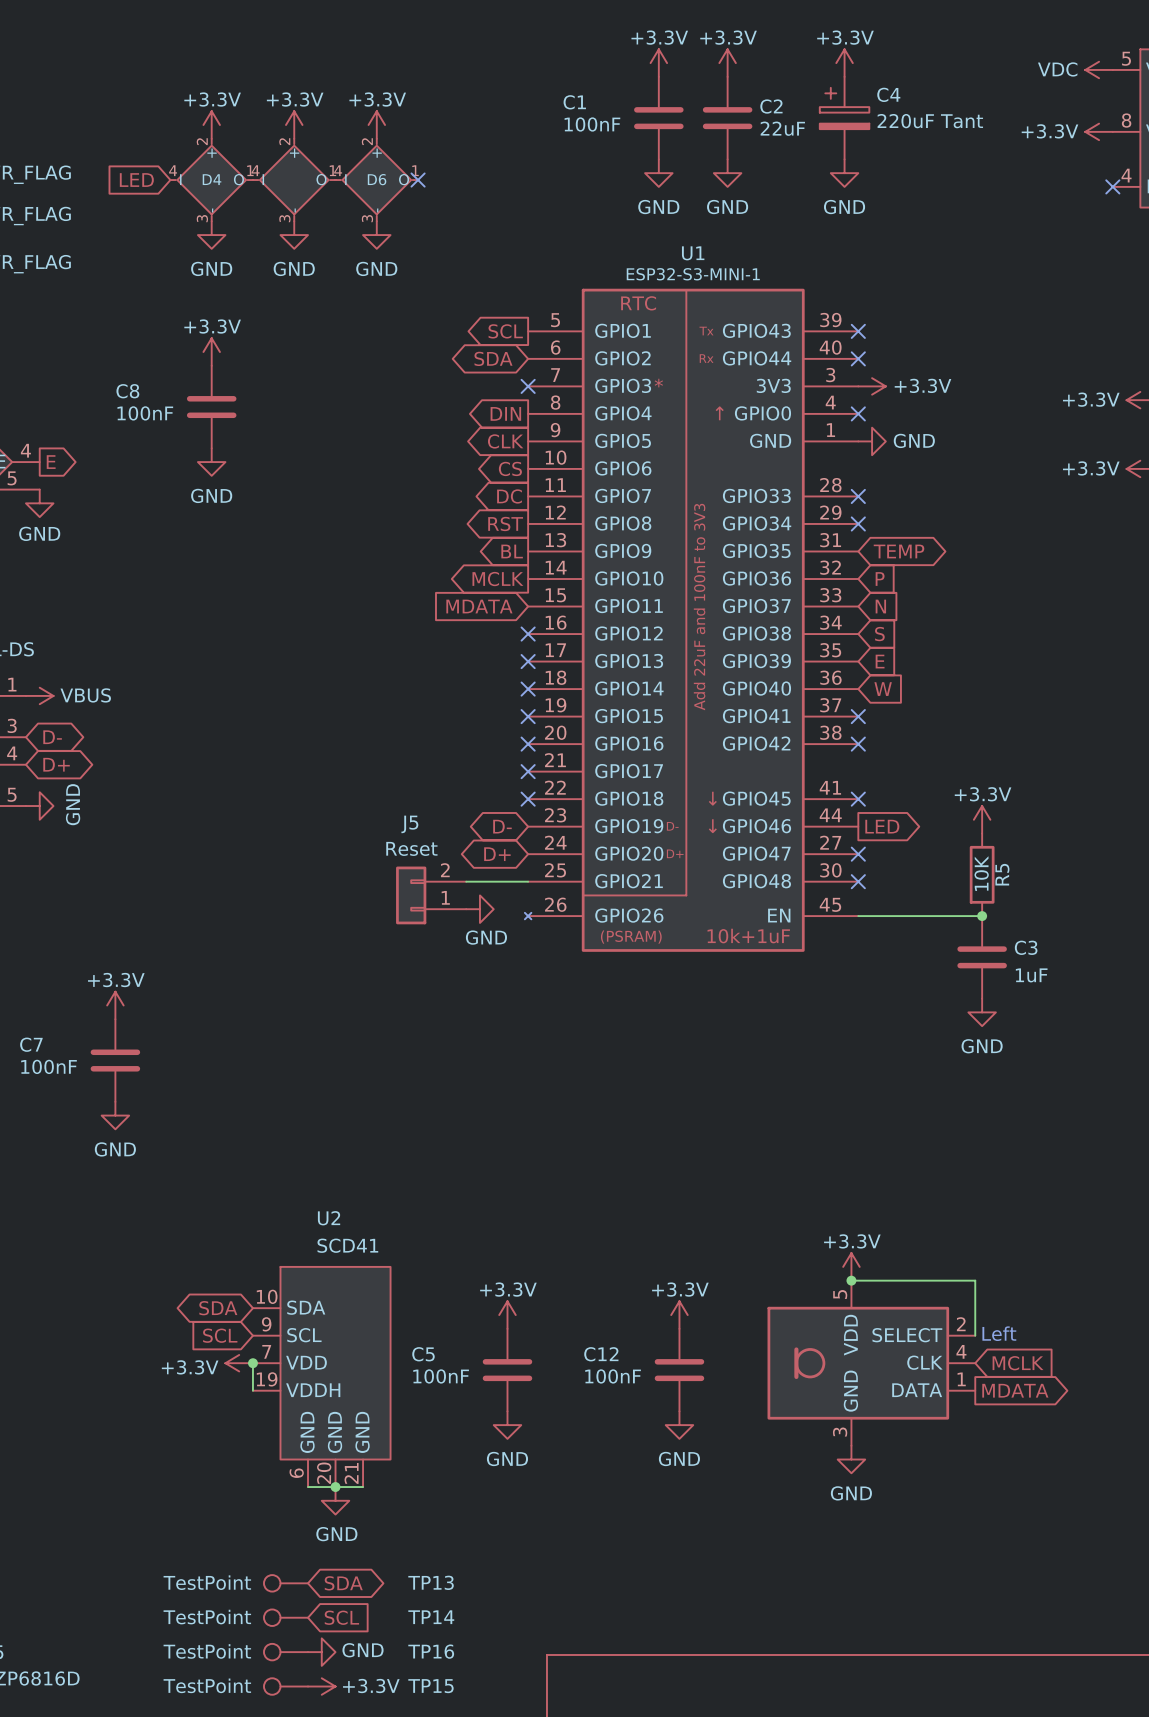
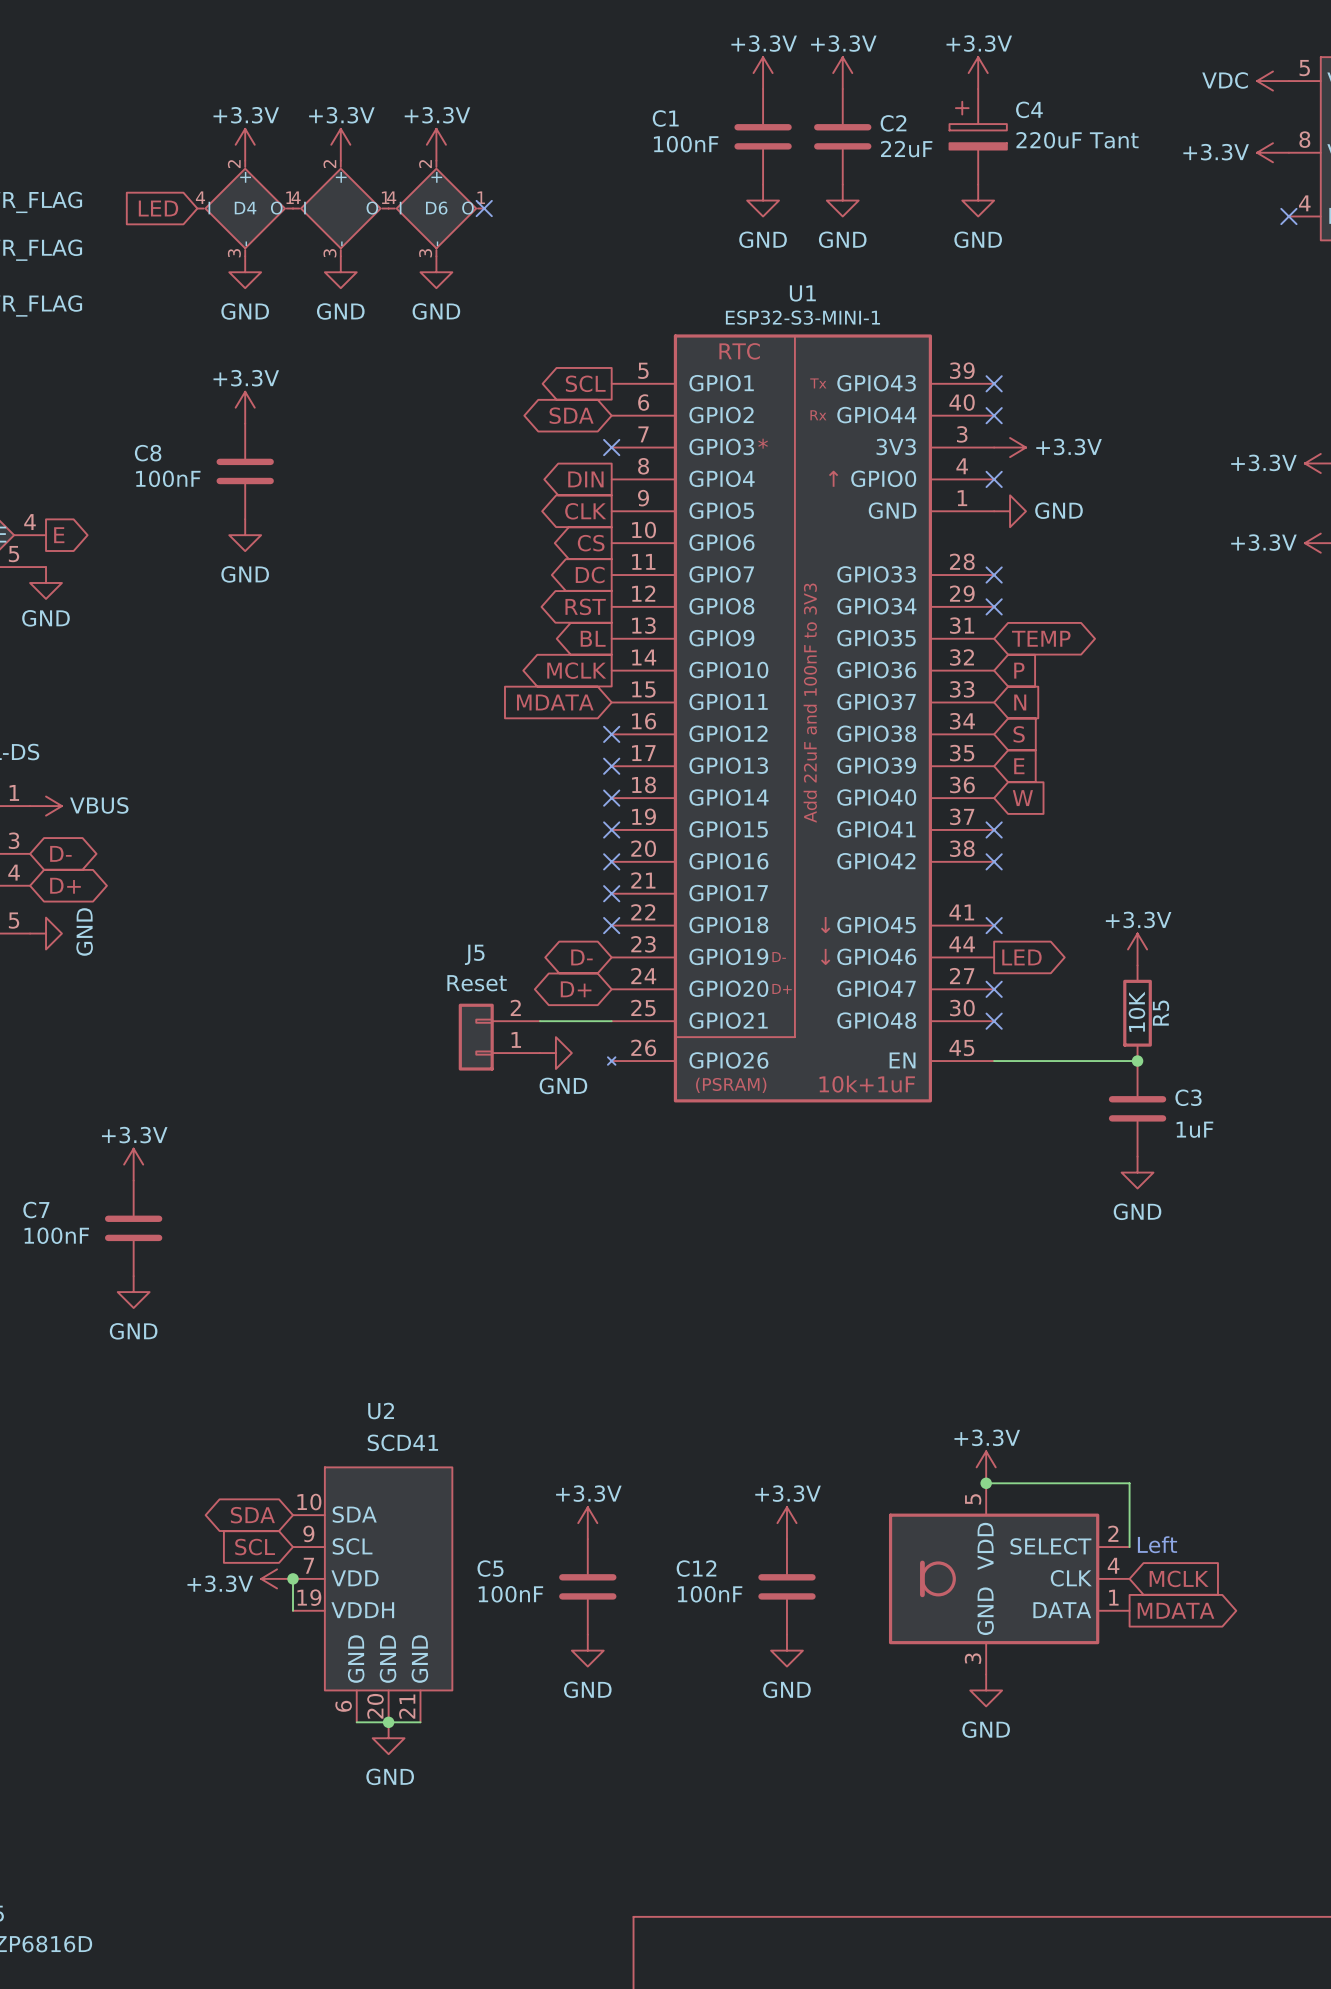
TP13: TestPoint (285, 1583) -> none
global label: SDA (343, 1583) -> none
TP14: TestPoint (285, 1617) -> none
global label: SCL (341, 1617) -> none
TP16: TestPoint (285, 1652) -> none
power symbol: GND (321, 1652) -> none
TP15: TestPoint (285, 1686) -> none
power symbol: +3.3V (321, 1686) -> none

